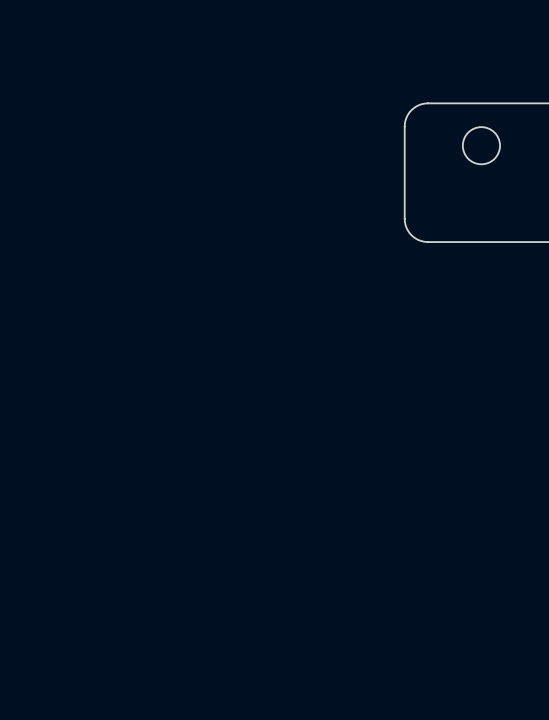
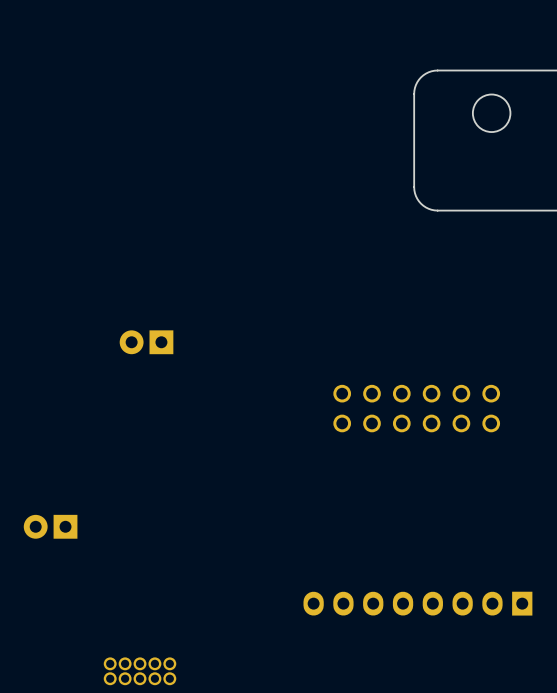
part: none -> (146, 342)
part: none -> (416, 408)
part: none -> (50, 526)
part: none -> (417, 603)
part: none -> (140, 671)

